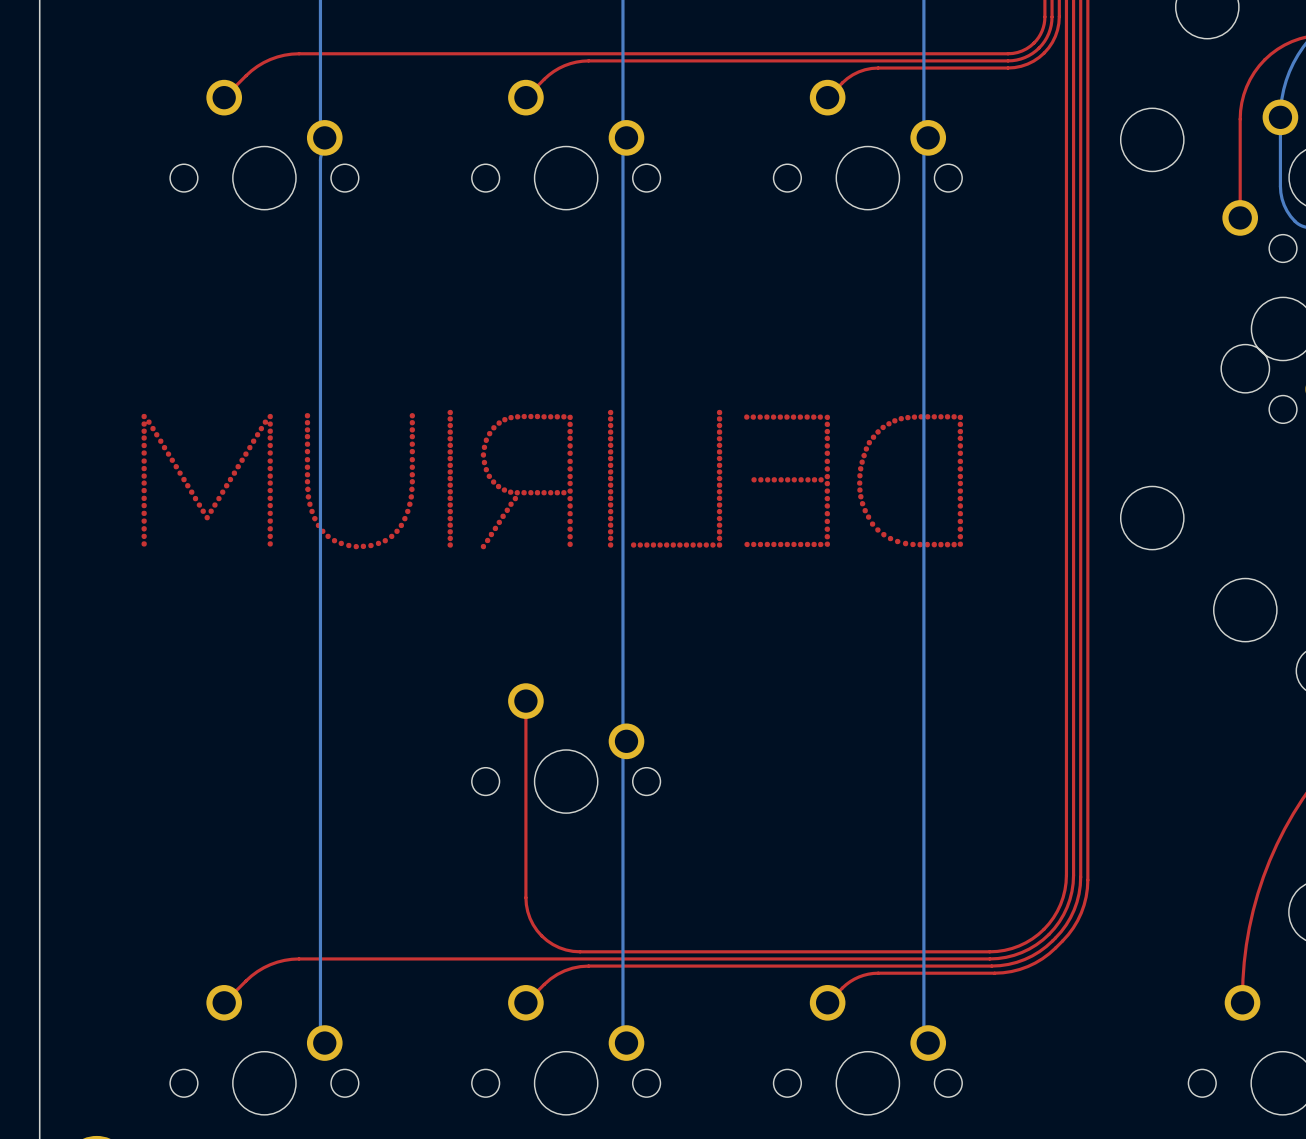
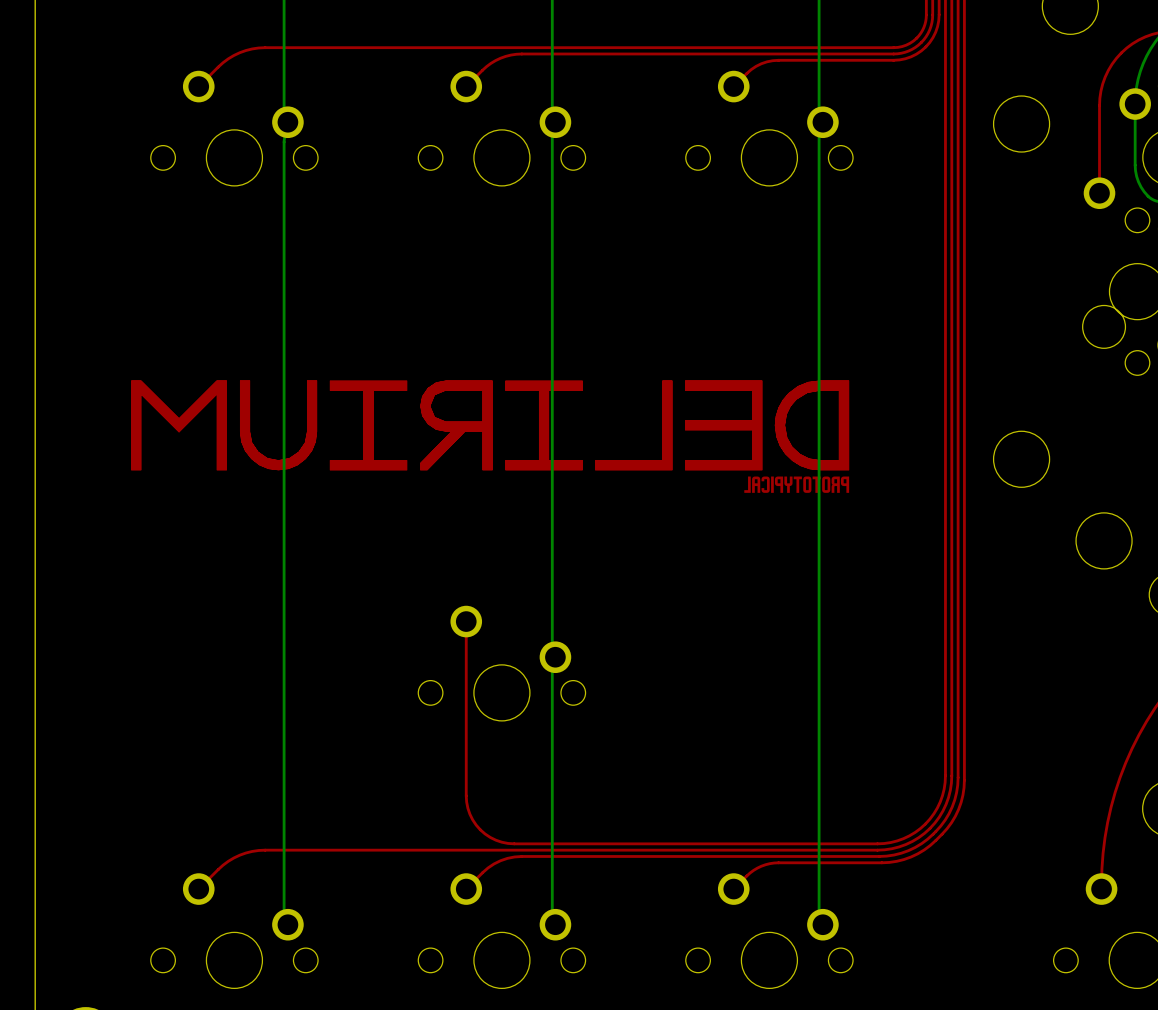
drawing: [141, 409, 964, 550] -> none
drawing: none -> [131, 380, 850, 493]

